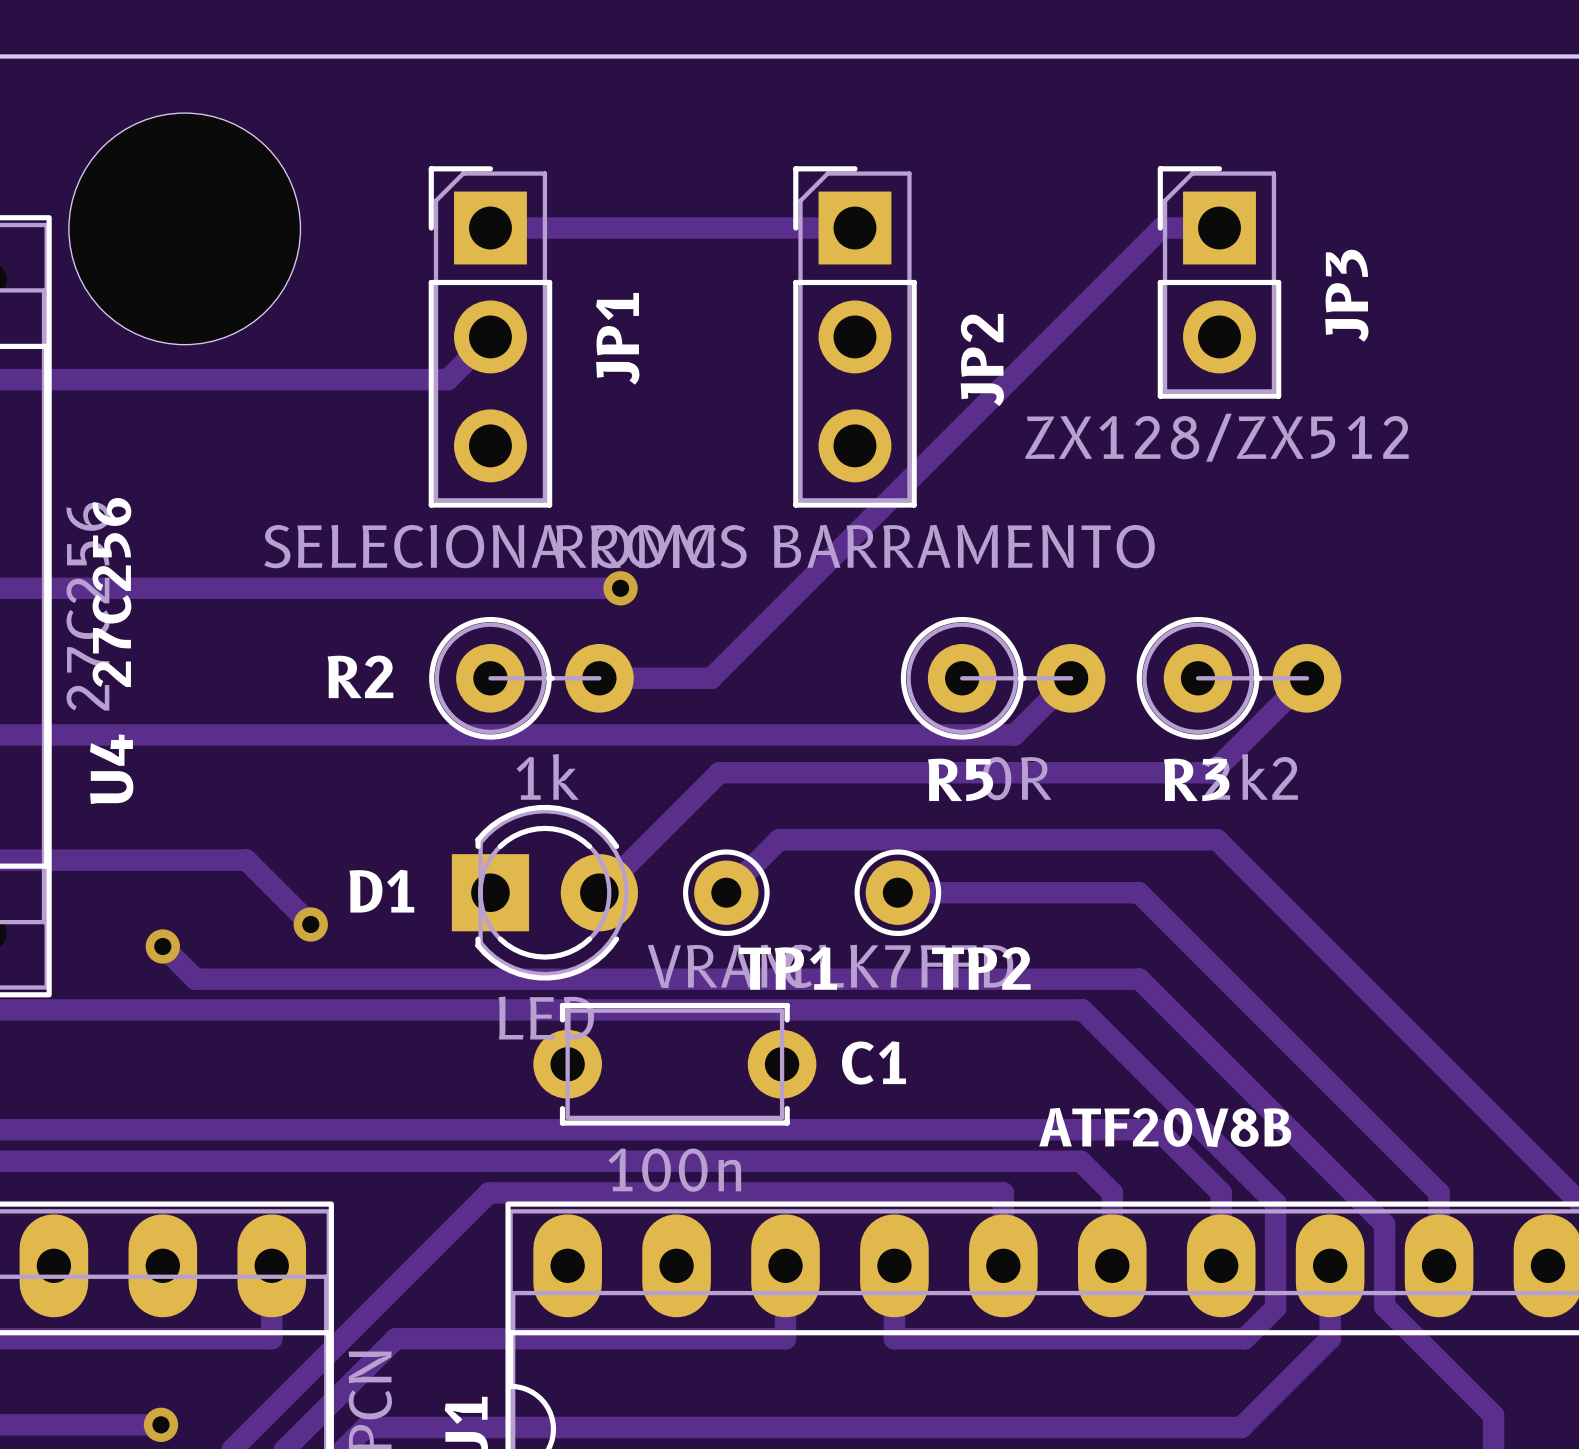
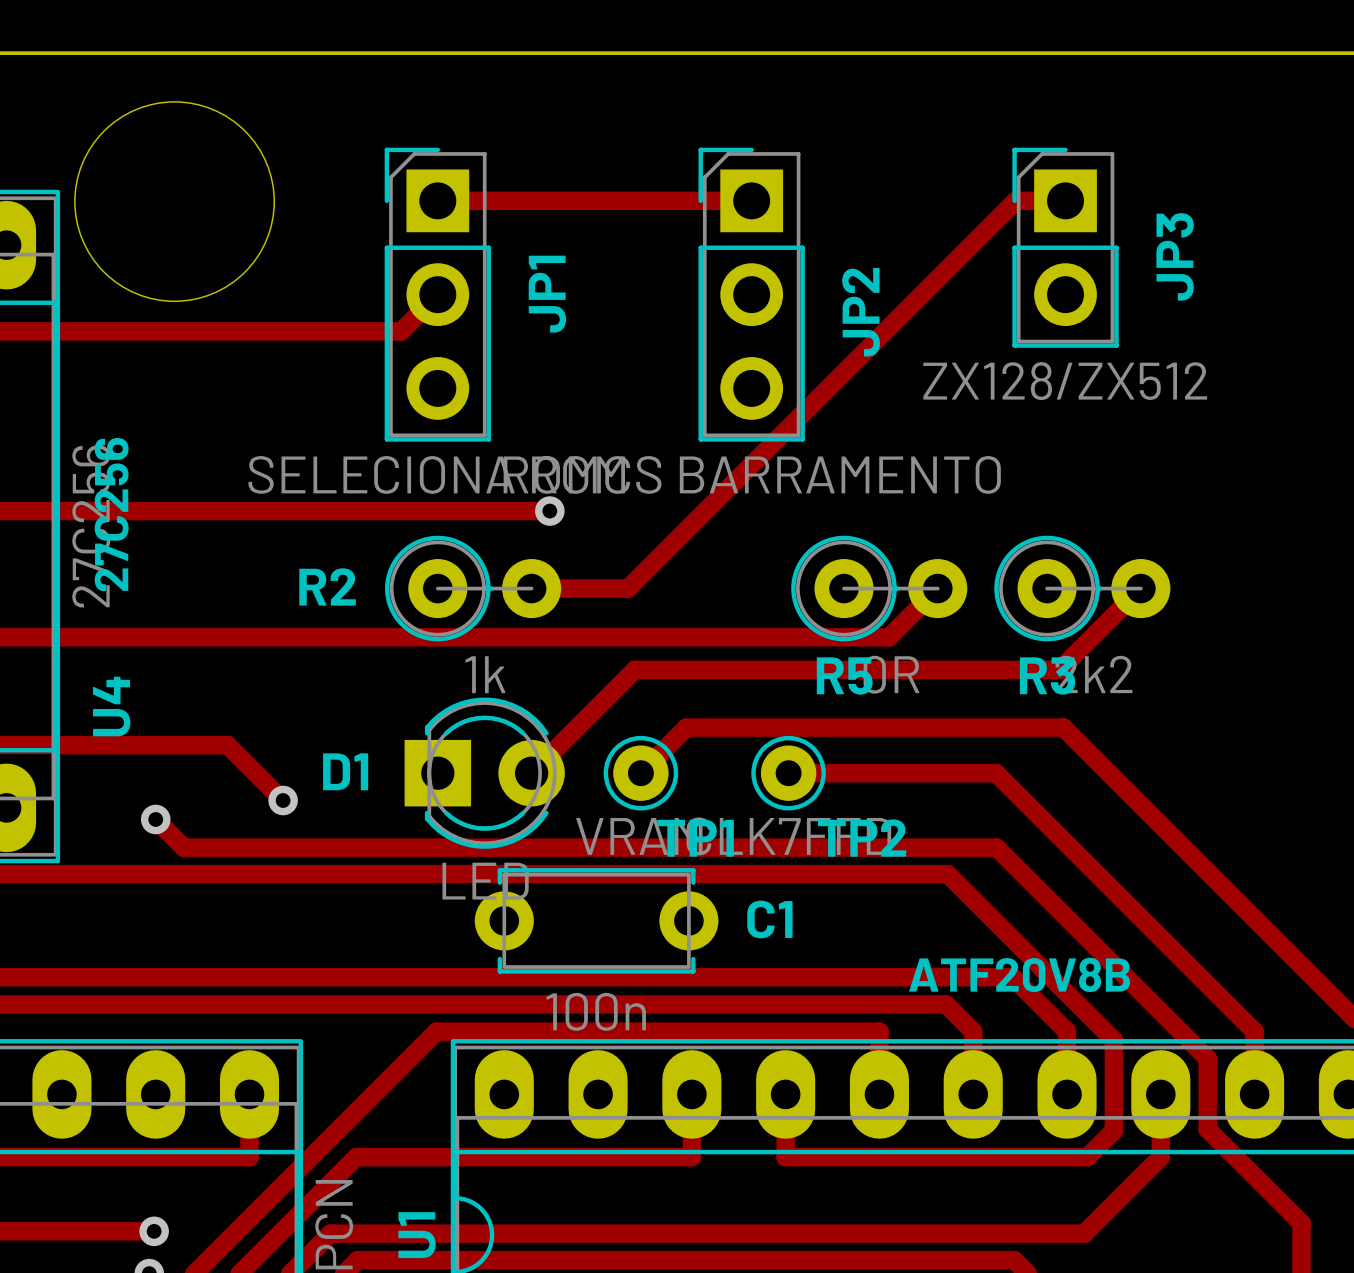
U4 name position: U4 (111, 769) -> U4 (111, 706)

